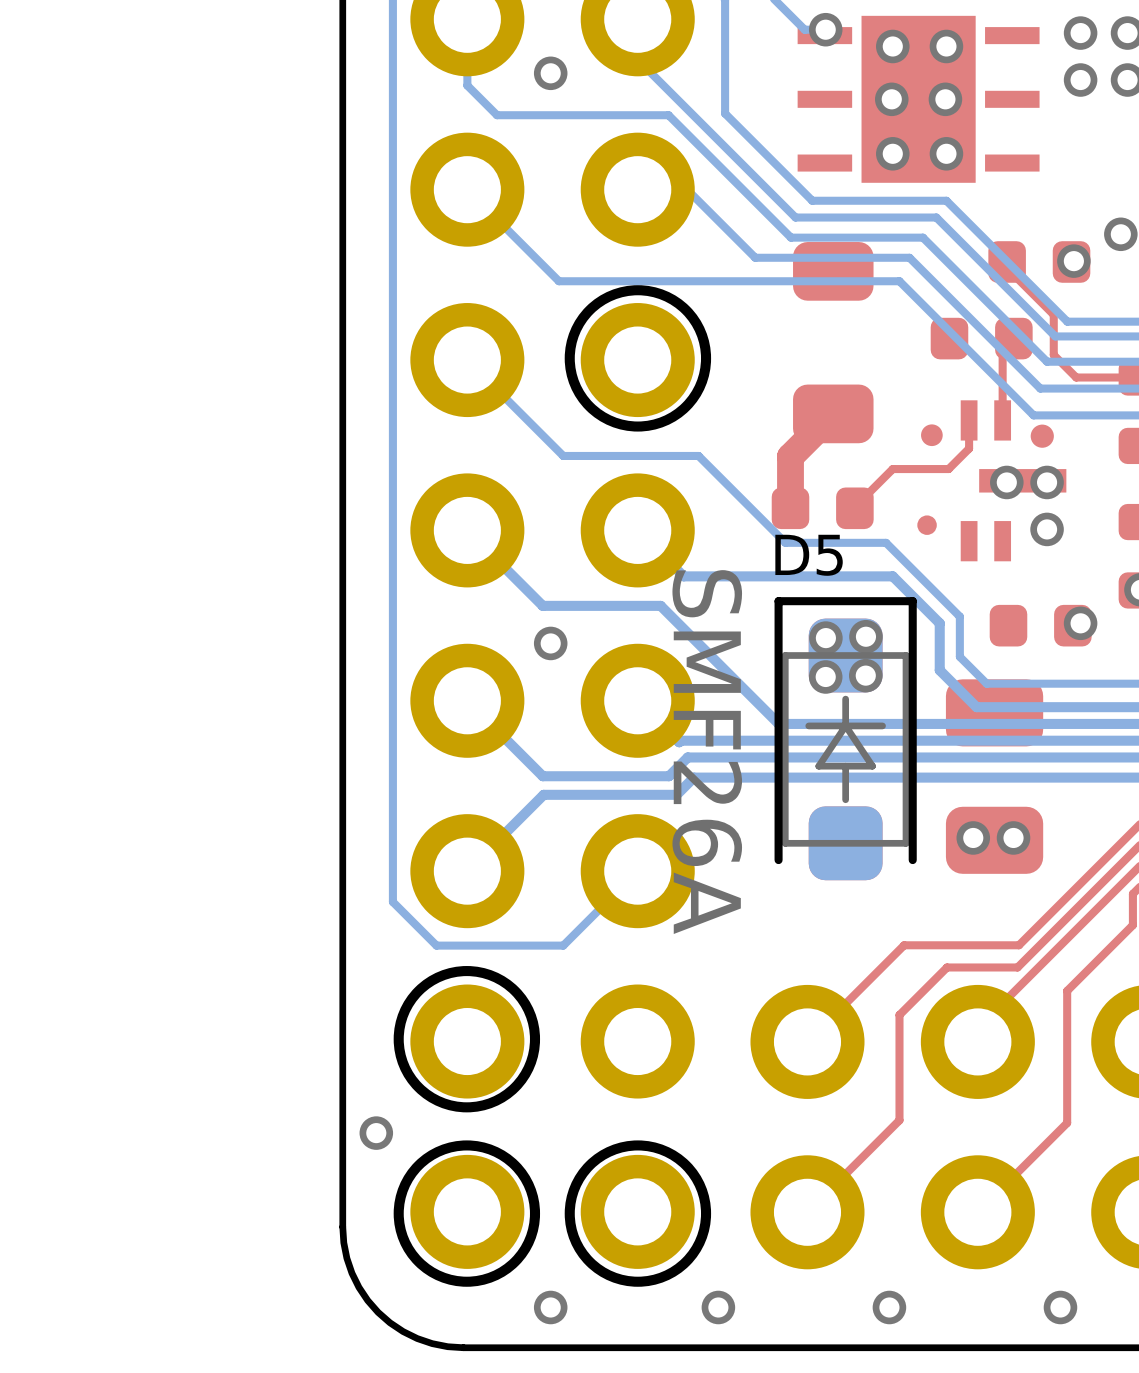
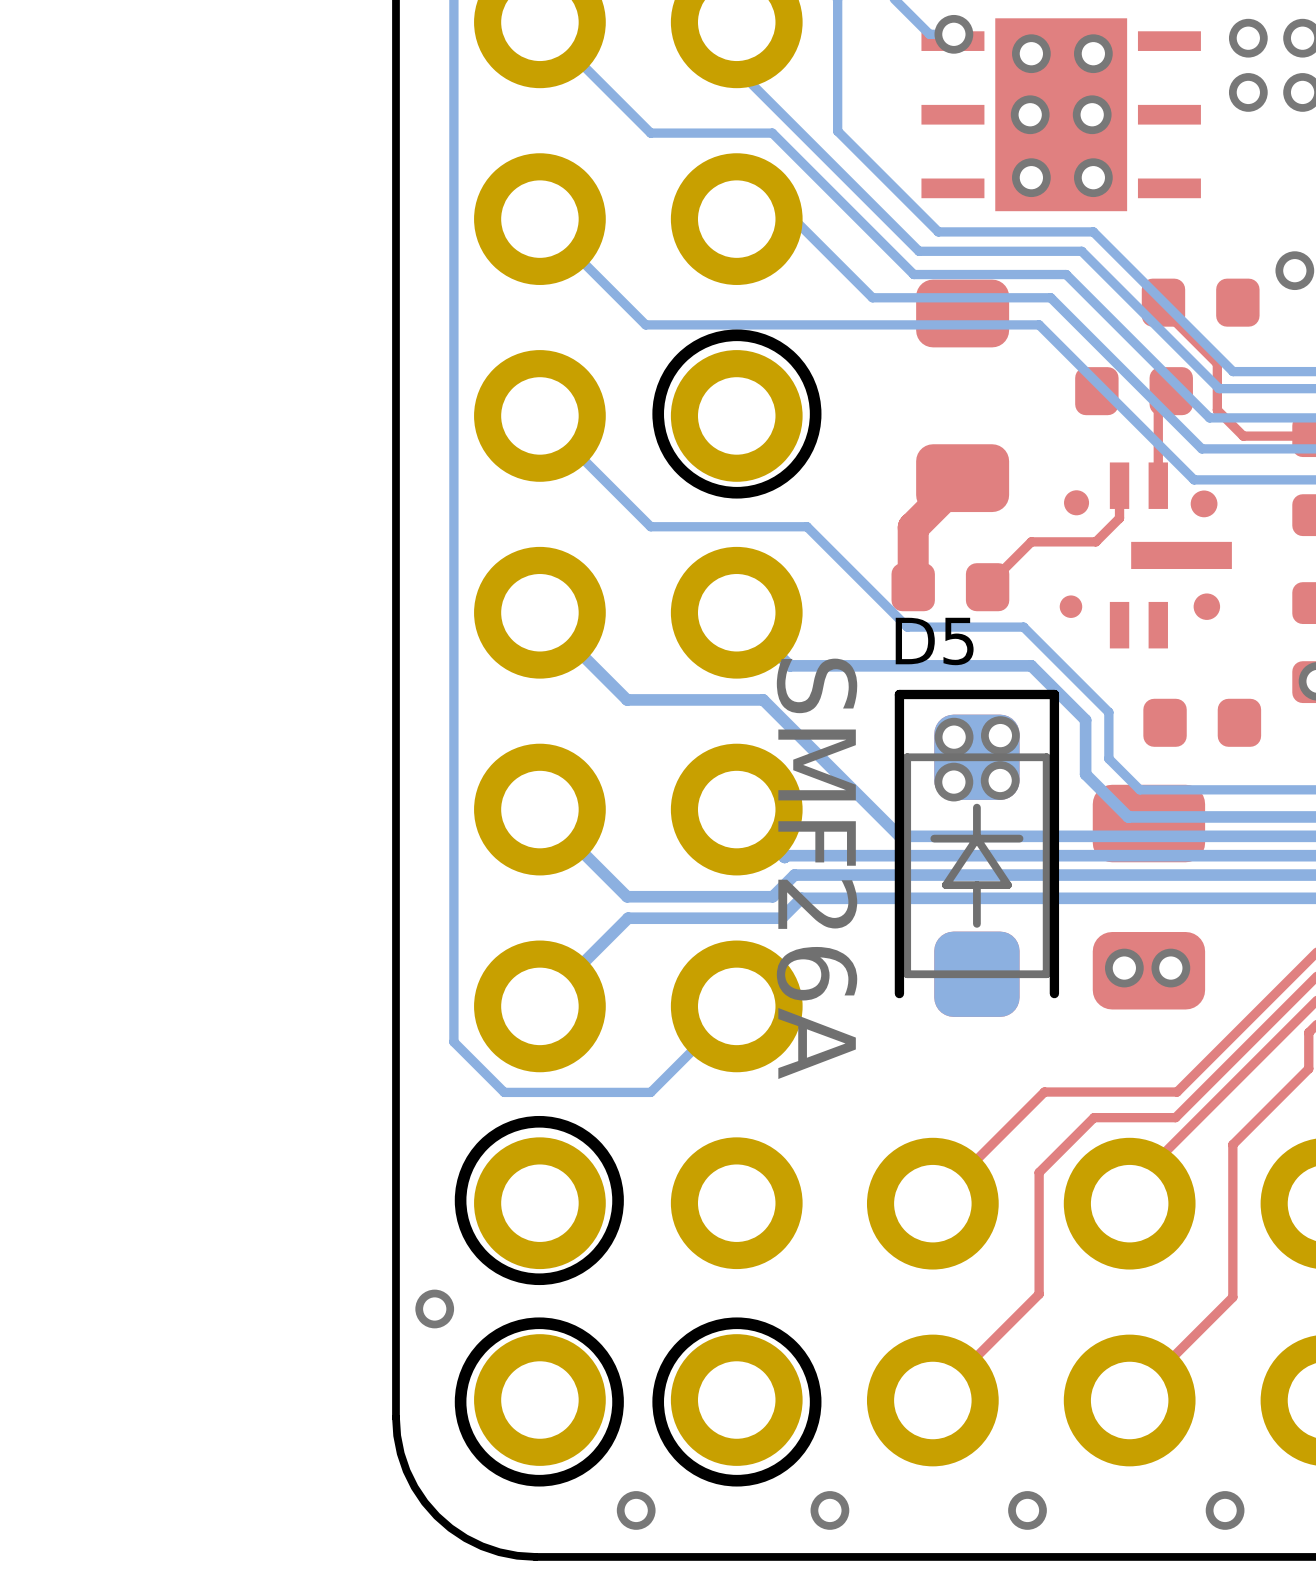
bottom track: (467, 19) (467, 85) (497, 115) (563, 115) -> (539, 22) (650, 133)
via: (550, 73) -> none
via: (1073, 261) -> none
via: (1006, 482) -> none
via: (1047, 482) -> none
via: (1047, 529) -> none
via: (1080, 623) -> none
via: (550, 643) -> none

